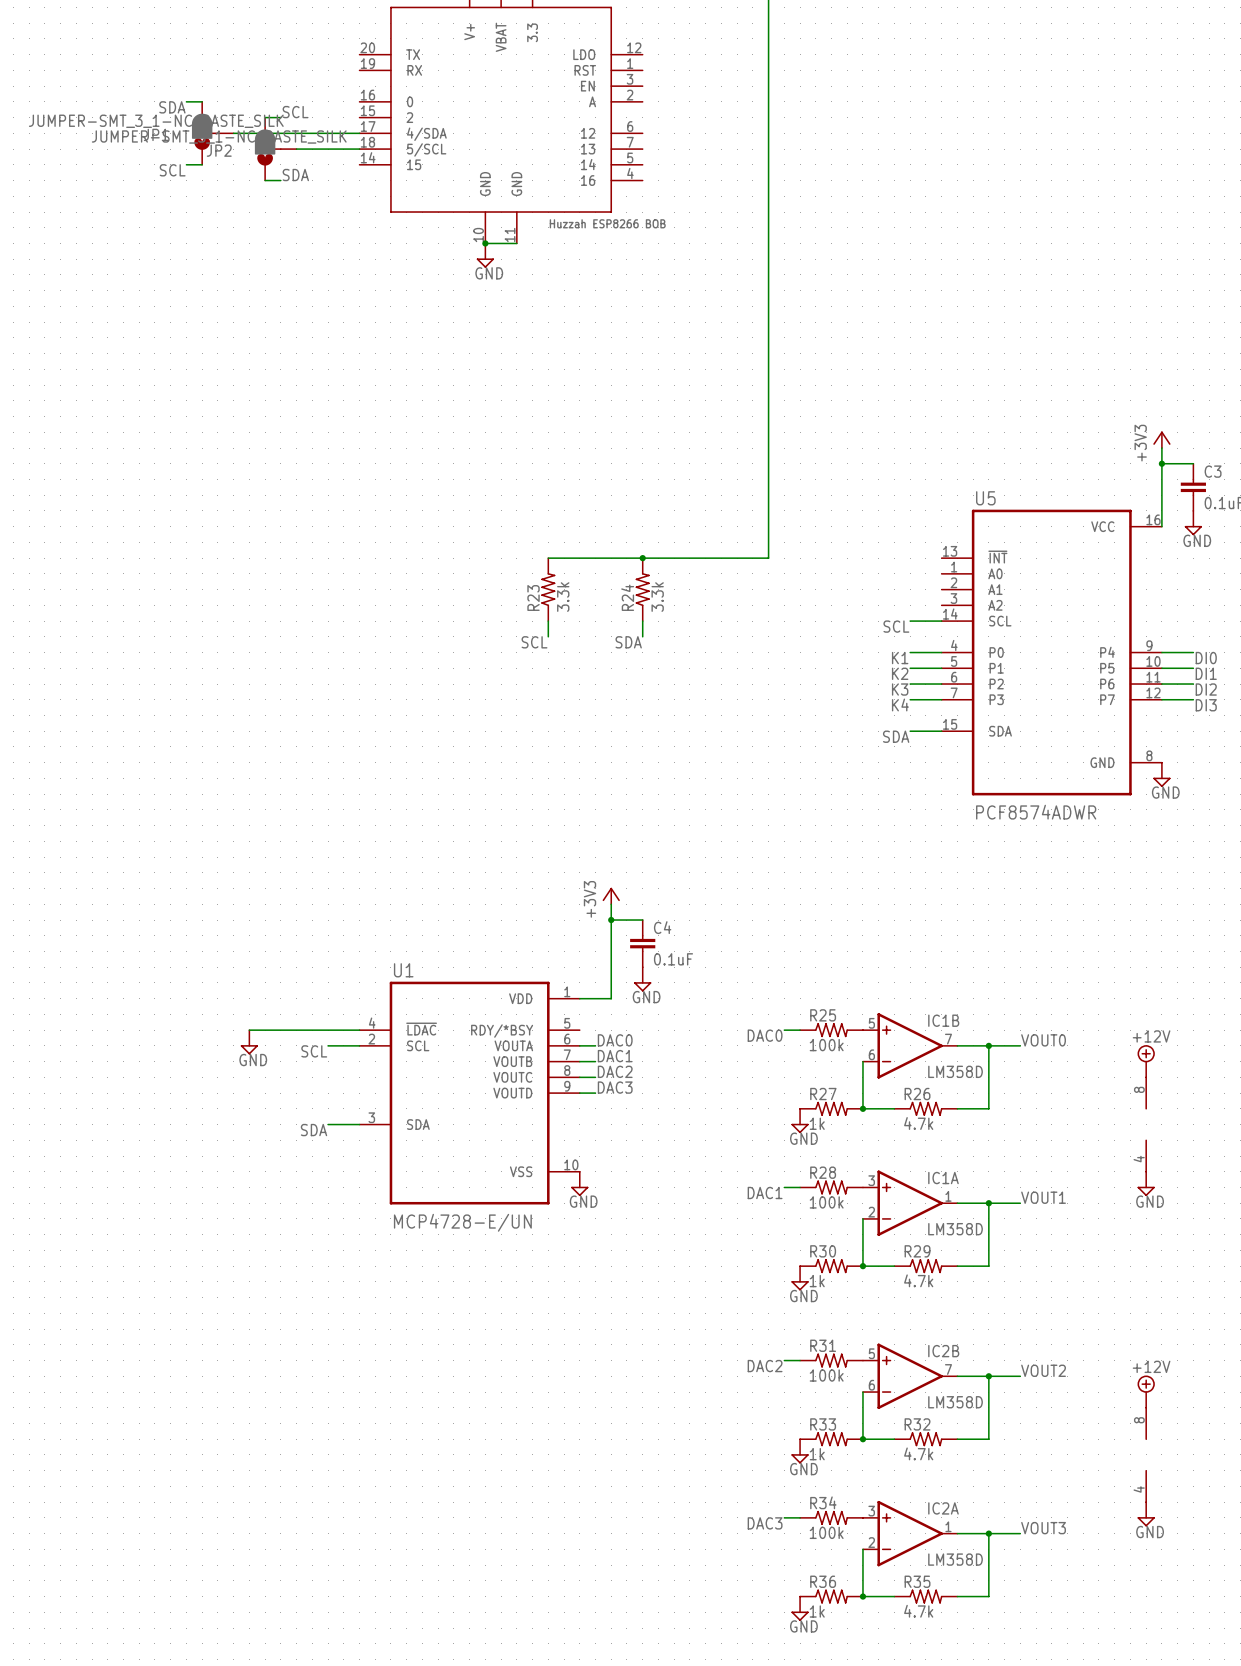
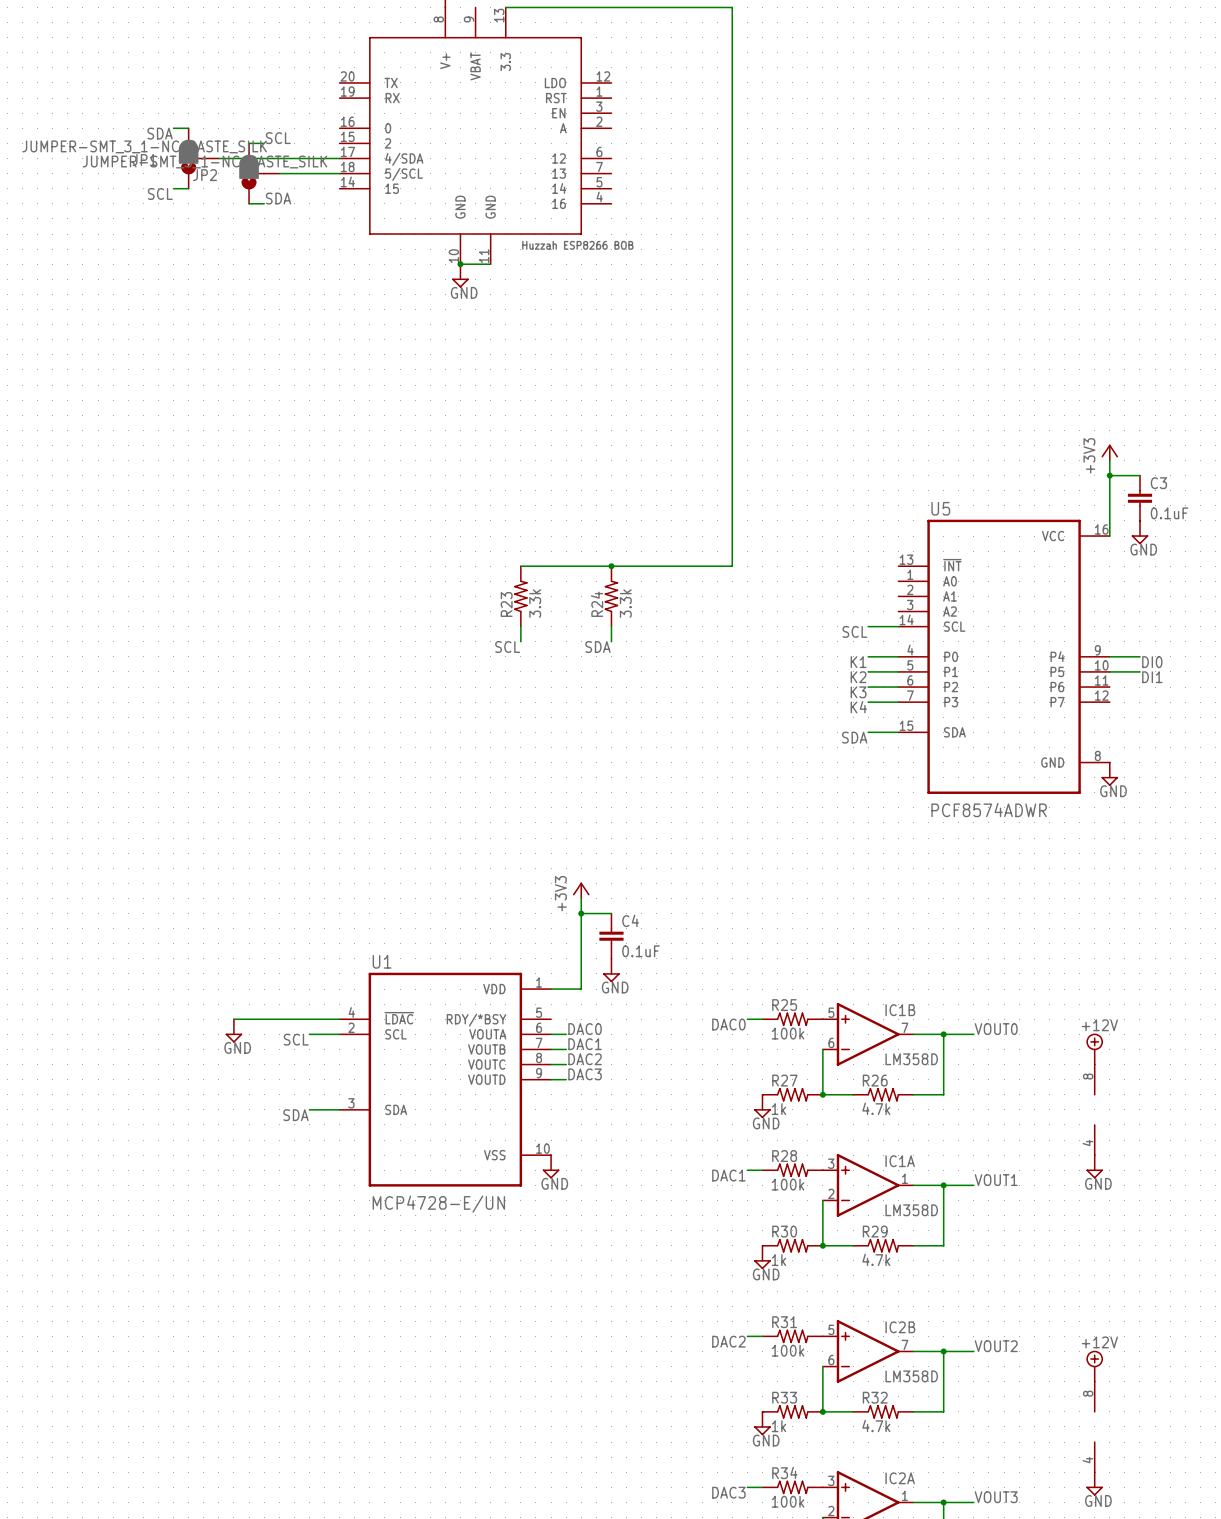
wire: (1161, 684) (1193, 684) -> none
label: DI2 (1206, 689) -> none
wire: (1161, 699) (1193, 699) -> none
label: DI3 (1206, 705) -> none

